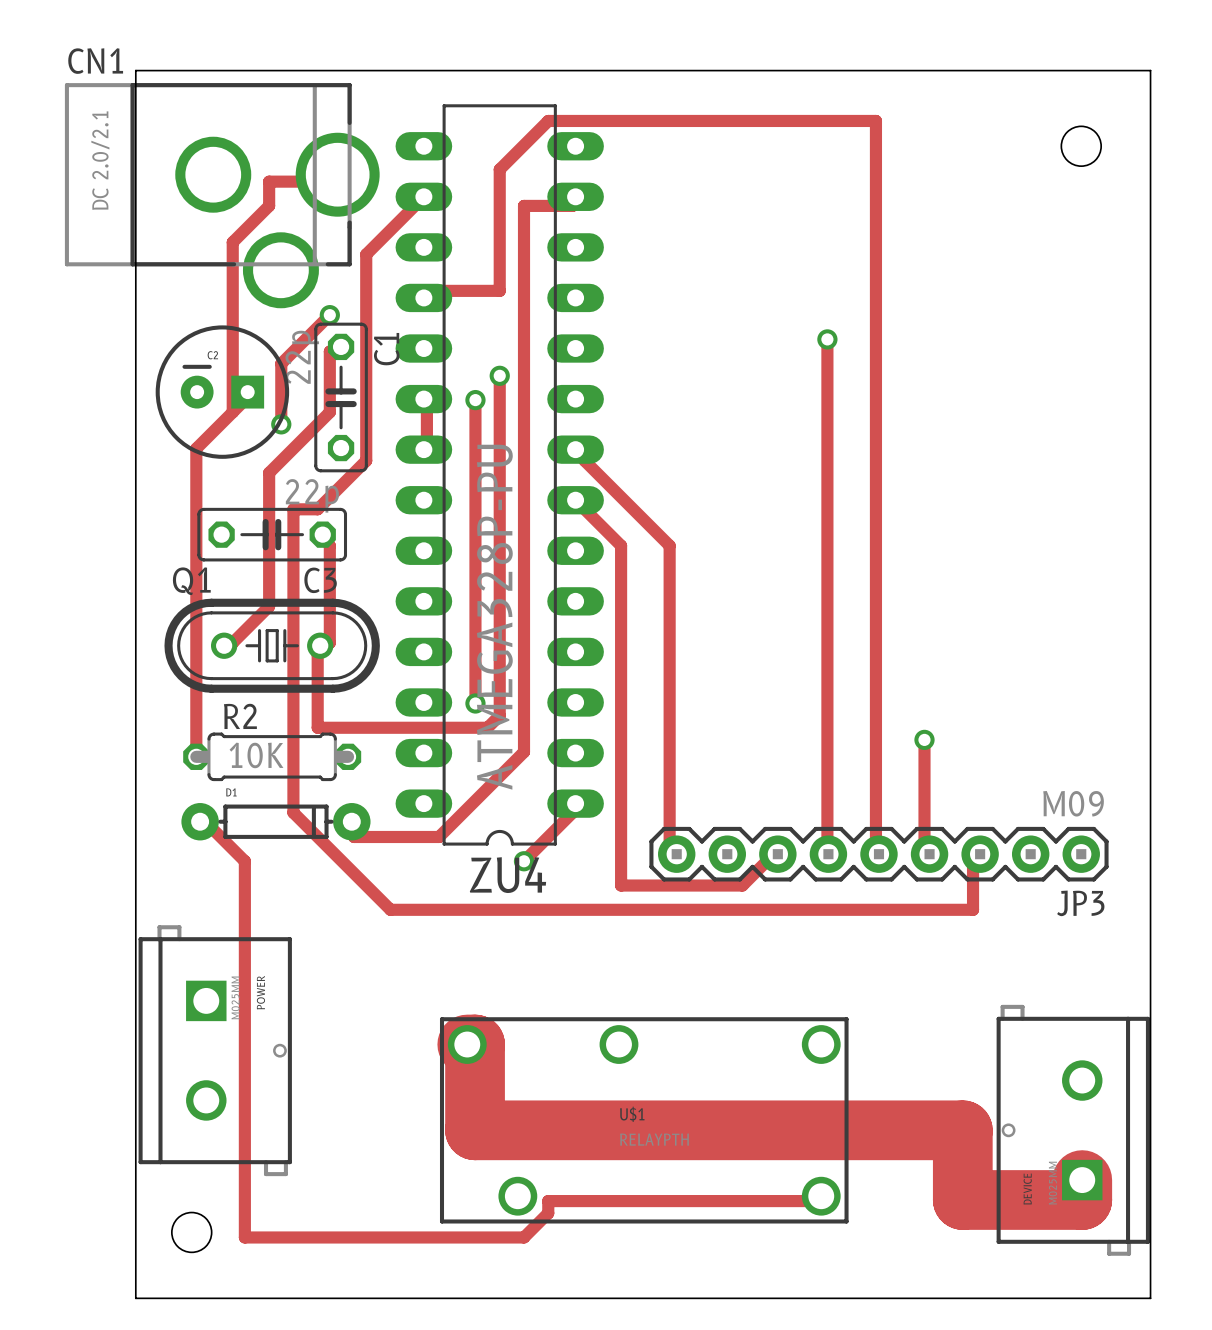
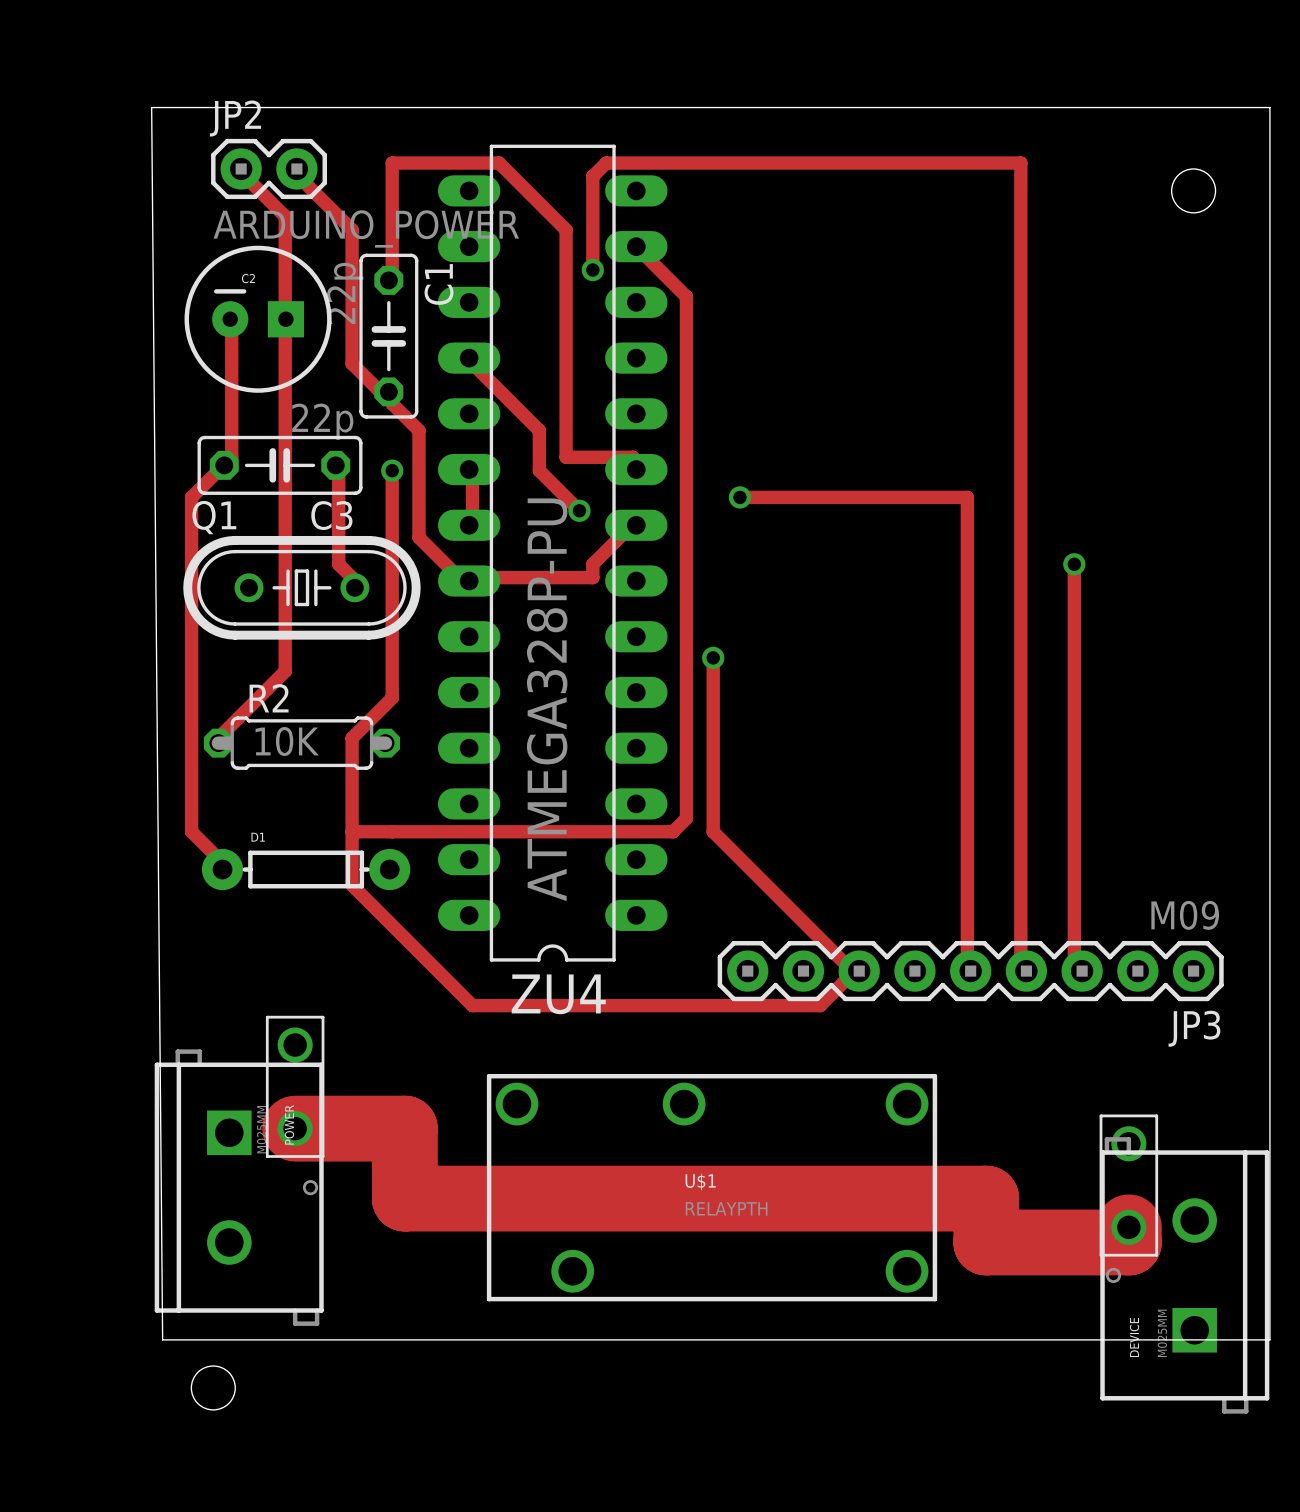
board edge: (135, 70) (135, 1298) (1150, 1298) (1150, 1188) -> (151, 107) (162, 1339) (1269, 1339)
track: (875, 120) (875, 424) -> (967, 163) (1020, 163) (1020, 845)
JP2: none -> ARDUINO_POWER (269, 168)
track: (536, 133) (499, 169) (499, 290) (426, 290) (423, 297) -> (592, 176) (592, 270)
track: (337, 174) (329, 181) (269, 181) (269, 205) (232, 242) (232, 412) -> none
CN1: (222, 195) -> none
track: (423, 196) (366, 254) (366, 460) (317, 509) (293, 509) (293, 812) (390, 909) (973, 909) (973, 861) (980, 854) -> (1074, 564) (1074, 965) (1082, 971)
track: (575, 196) (572, 205) (524, 205) (524, 752) (439, 836) (354, 836) (354, 824) (351, 821) -> none
via: none -> (592, 270)
track: none -> (388, 280) (392, 270) (392, 163) (499, 163) (566, 229) (566, 457) (632, 457) (636, 469)
track: none -> (230, 319) (231, 457) (191, 497) (191, 831) (218, 858) (222, 869)
track: none -> (469, 358) (539, 430) (539, 470) (579, 510)
track: (329, 315) (281, 363) (281, 424) -> none
via: (329, 315) -> none
track: (827, 339) (828, 854) -> none
via: (827, 339) -> none
track: (341, 346) (329, 351) (329, 412) (269, 472) (269, 606) (232, 642) (224, 645) -> none
track: (499, 375) (499, 715) (487, 727) -> none
via: (499, 375) -> none
C2 position: (222, 392) -> (258, 319)
track: (247, 392) (244, 400) (196, 448) (196, 642) -> (241, 168) (245, 176) (285, 216) (285, 671) (218, 738)
track: none -> (335, 465) (338, 470) (338, 564) (352, 577) (354, 587)
C1 position: (341, 397) -> (388, 336)
via: none -> (392, 470)
track: (475, 400) (475, 703) -> none
via: (475, 400) -> none
via: (281, 424) -> none
track: none -> (739, 497) (967, 497)
via: none -> (739, 497)
via: none -> (579, 510)
track: (575, 449) (669, 545) (669, 849) (676, 854) -> (636, 525) (632, 524) (592, 564) (592, 577) (472, 577) (469, 581) (459, 577) (418, 537) (418, 430) (392, 403) (388, 391) (378, 390) (352, 363) (352, 229) (298, 176) (296, 168)
via: none -> (1074, 564)
track: (575, 500) (621, 545) -> (636, 246) (686, 296) (686, 631)
C3 position: (272, 534) -> (280, 465)
track: (322, 534) (329, 545) (329, 642) (320, 645) (317, 654) -> (392, 470) (392, 698) (352, 738) (352, 751)
track: none -> (713, 657) (713, 831) (846, 965) (859, 971)
via: none -> (713, 657)
Q1 position: (272, 645) -> (301, 587)
track: (196, 647) (196, 756) -> none
via: (475, 703) -> none
track: (621, 715) (621, 885) -> (686, 818) (673, 831) (539, 831)
track: none -> (352, 831) (352, 885) (472, 1005) (686, 1005)
via: (924, 739) -> none
R2 position: (272, 756) -> (301, 743)
track: (575, 803) (572, 812) (524, 861) -> none
track: (200, 821) (208, 824) (244, 861) (244, 1237) (524, 1237) (548, 1213) (548, 1201) (815, 1201) (821, 1196) -> none
D1 position: (275, 821) -> (306, 869)
via: (524, 861) -> none
part: none -> (295, 1086)
track: none -> (295, 1128) (404, 1128) (404, 1198) (986, 1198) (986, 1242) (1128, 1242) (1128, 1227)
track: (467, 1044) (475, 1044) (475, 1130) (962, 1130) (962, 1199) (1082, 1199) (1082, 1180) -> none
part: none -> (1128, 1185)
U$1 position: (644, 1120) -> (712, 1187)

